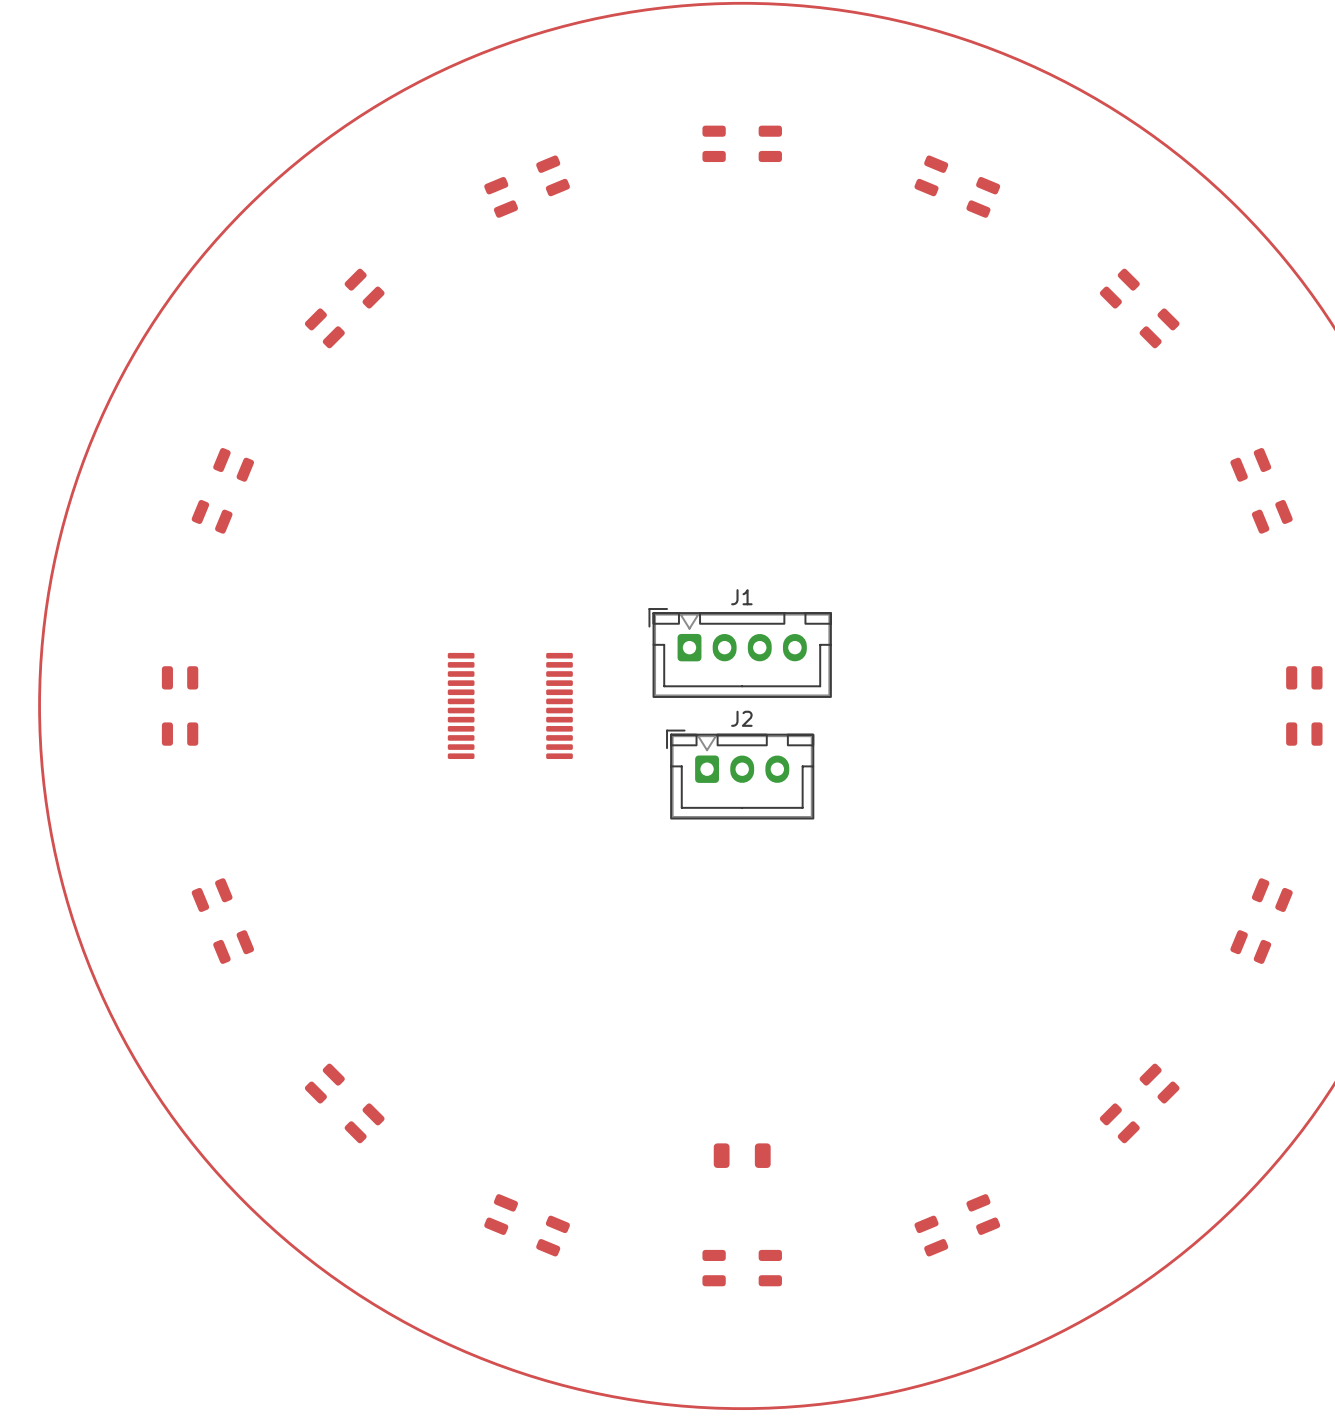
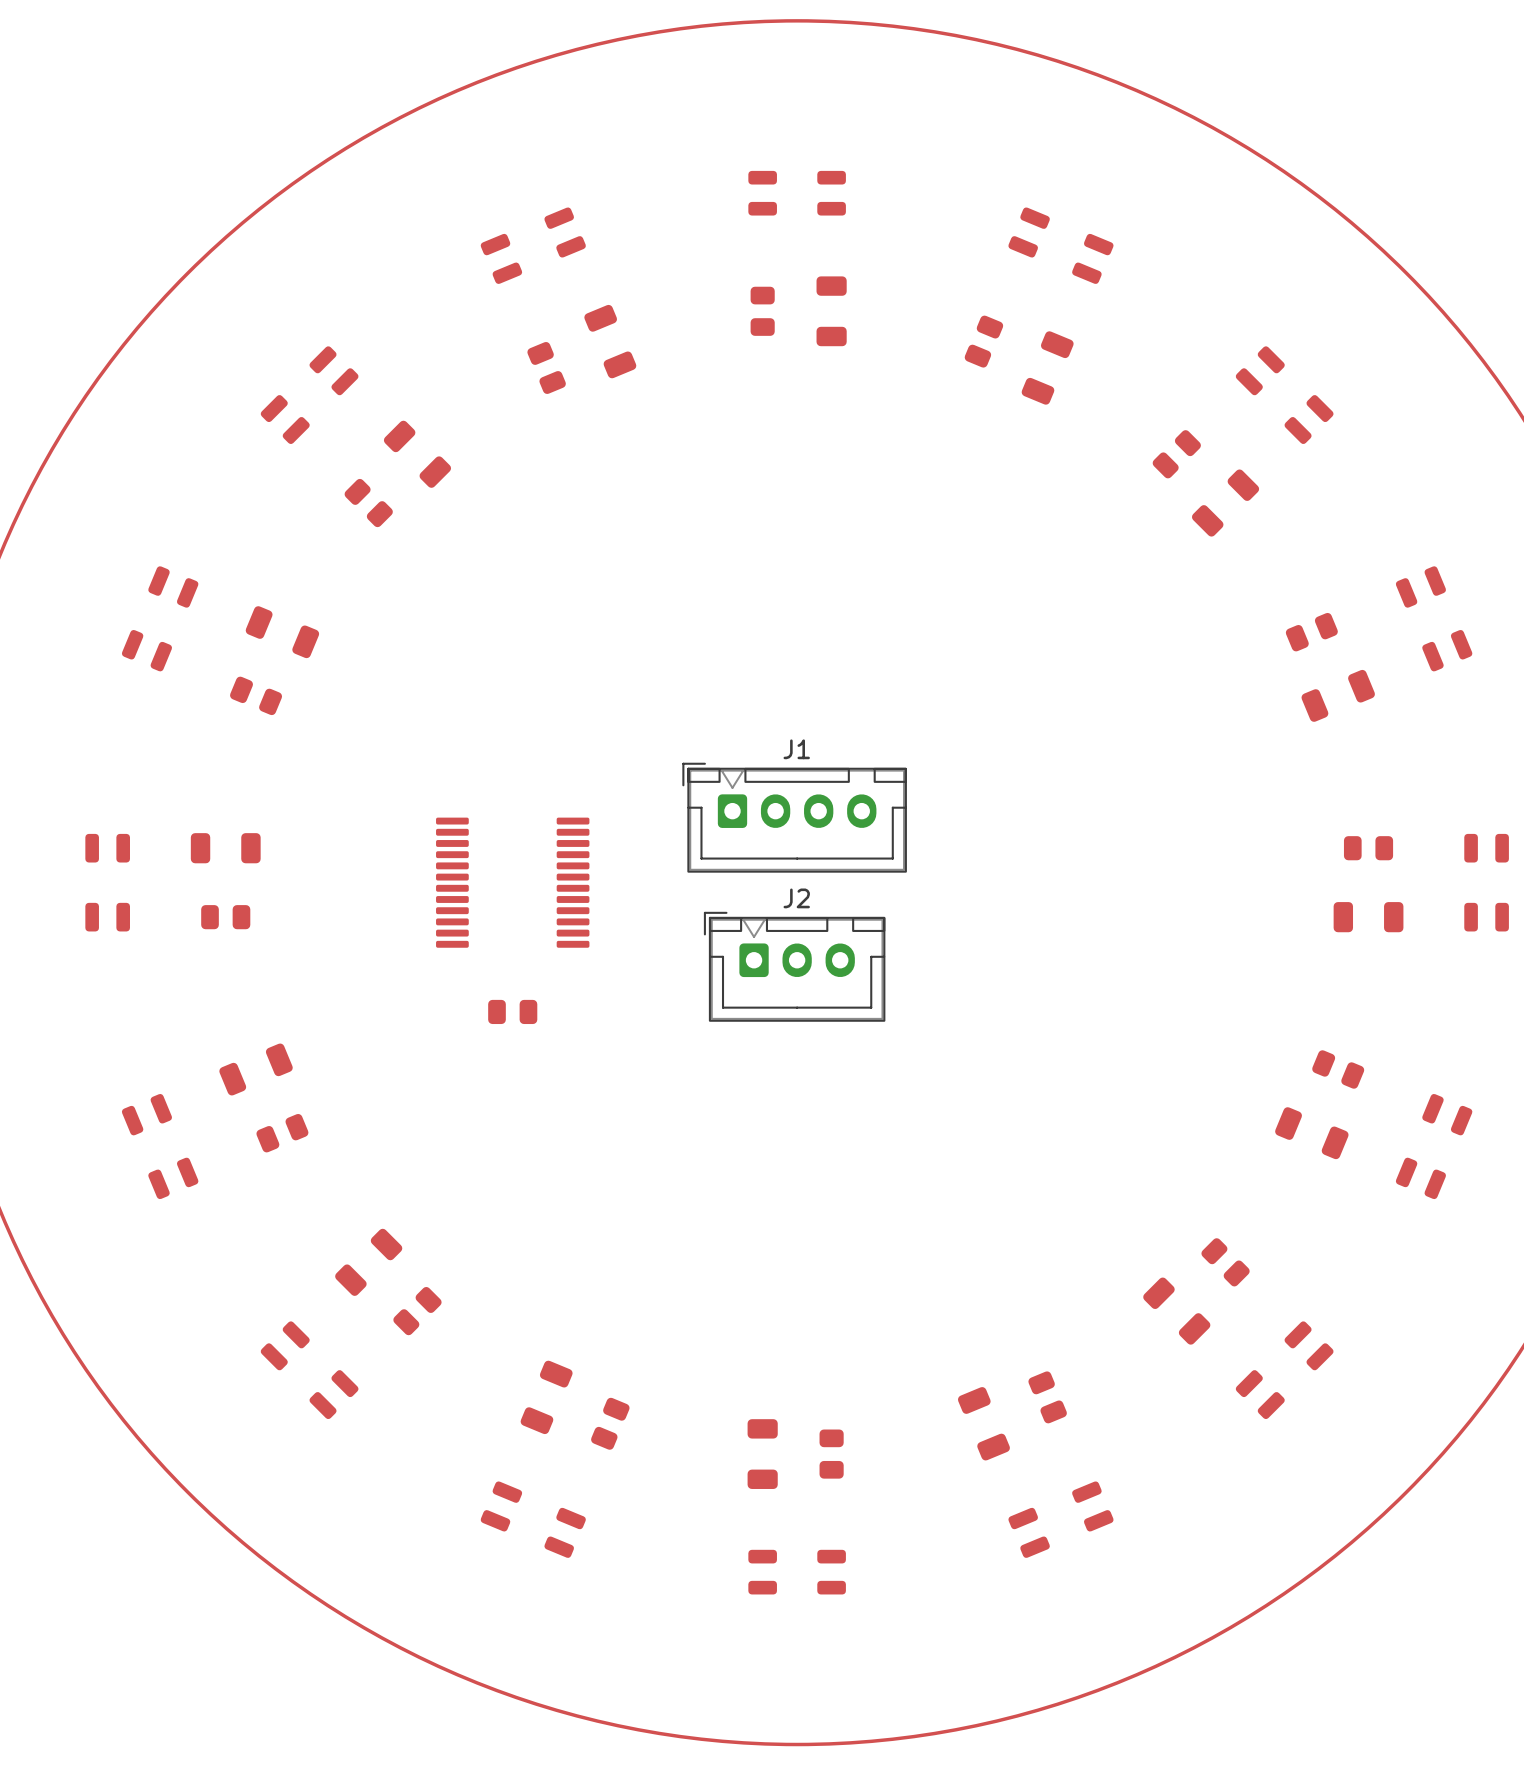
part: none -> (762, 311)
part: none -> (831, 311)
part: none -> (610, 341)
part: none -> (983, 341)
part: none -> (546, 367)
part: none -> (1047, 367)
part: none -> (417, 454)
part: none -> (1176, 454)
part: none -> (368, 503)
part: none -> (1225, 503)
part: none -> (282, 632)
part: none -> (1311, 632)
part: none -> (256, 695)
part: none -> (1338, 695)
part: none -> (225, 848)
part: none -> (1368, 848)
part: none -> (225, 917)
part: none -> (1368, 917)
part: none -> (512, 1011)
part: none -> (256, 1069)
part: none -> (1338, 1069)
part: none -> (282, 1133)
part: none -> (1311, 1133)
part: none -> (368, 1262)
part: none -> (1225, 1262)
part: none -> (417, 1311)
part: none -> (1176, 1311)
part: none -> (546, 1397)
part: none -> (1047, 1397)
part: none -> (610, 1423)
part: none -> (983, 1423)
part rotation: 0° (742, 1155) -> 90° clockwise (762, 1454)
part: none -> (831, 1454)

